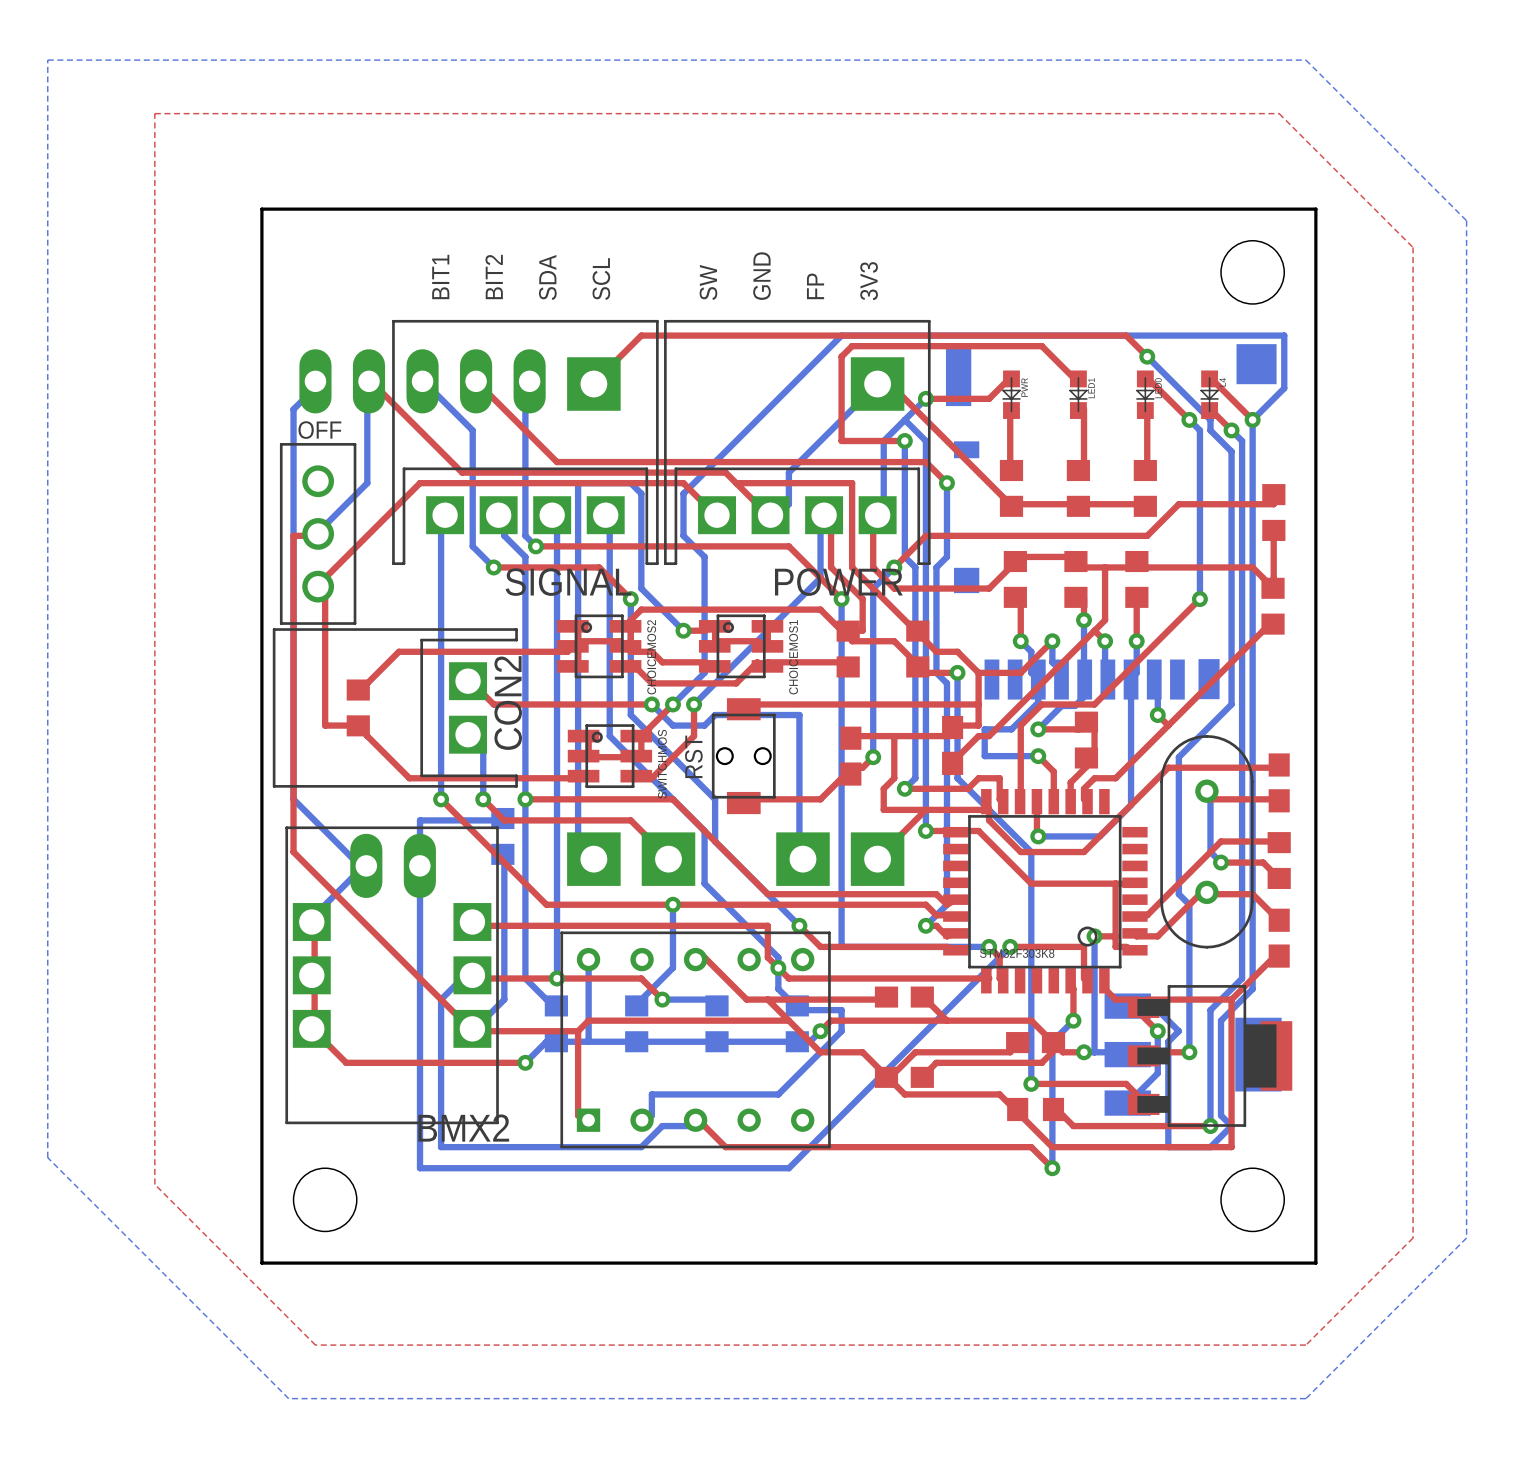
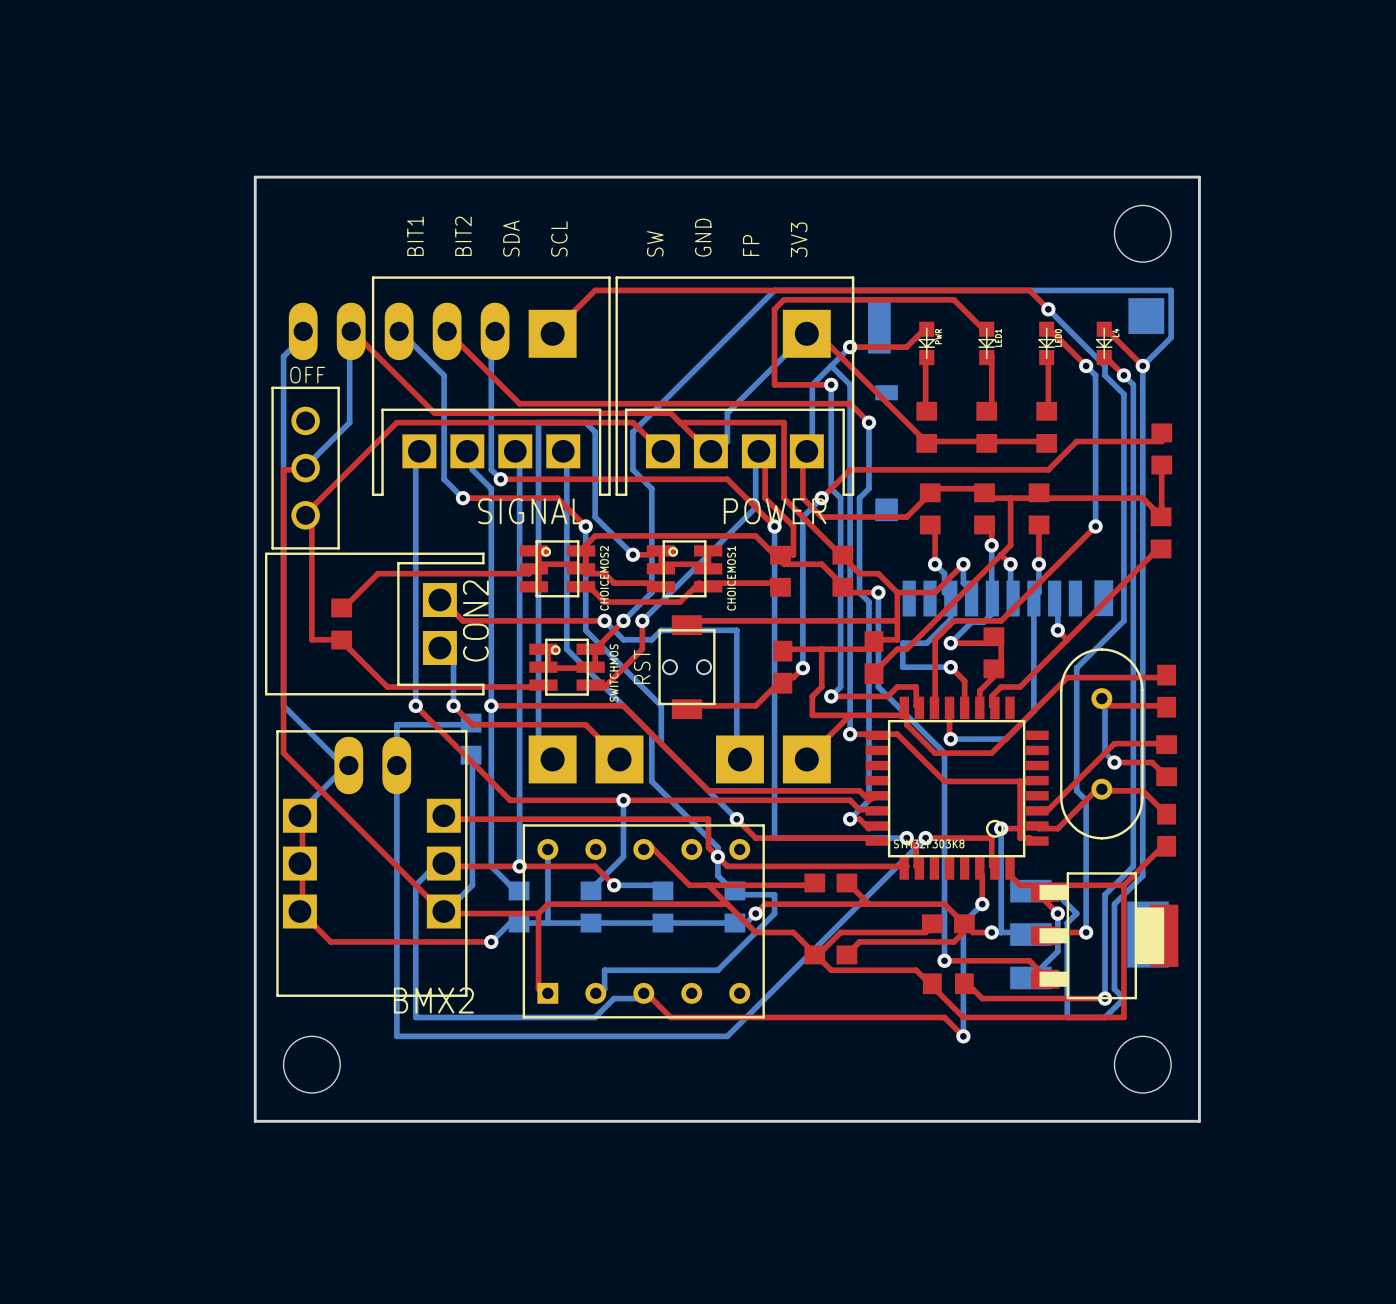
bottom zone outline: (47, 60) (1305, 60) (1466, 220) (1466, 1237) (1305, 1398) (288, 1398) (47, 1157) (47, 60) -> none
top zone outline: (154, 113) (1279, 113) (1413, 247) (1413, 1237) (1305, 1345) (315, 1345) (154, 1184) (154, 113) -> none

